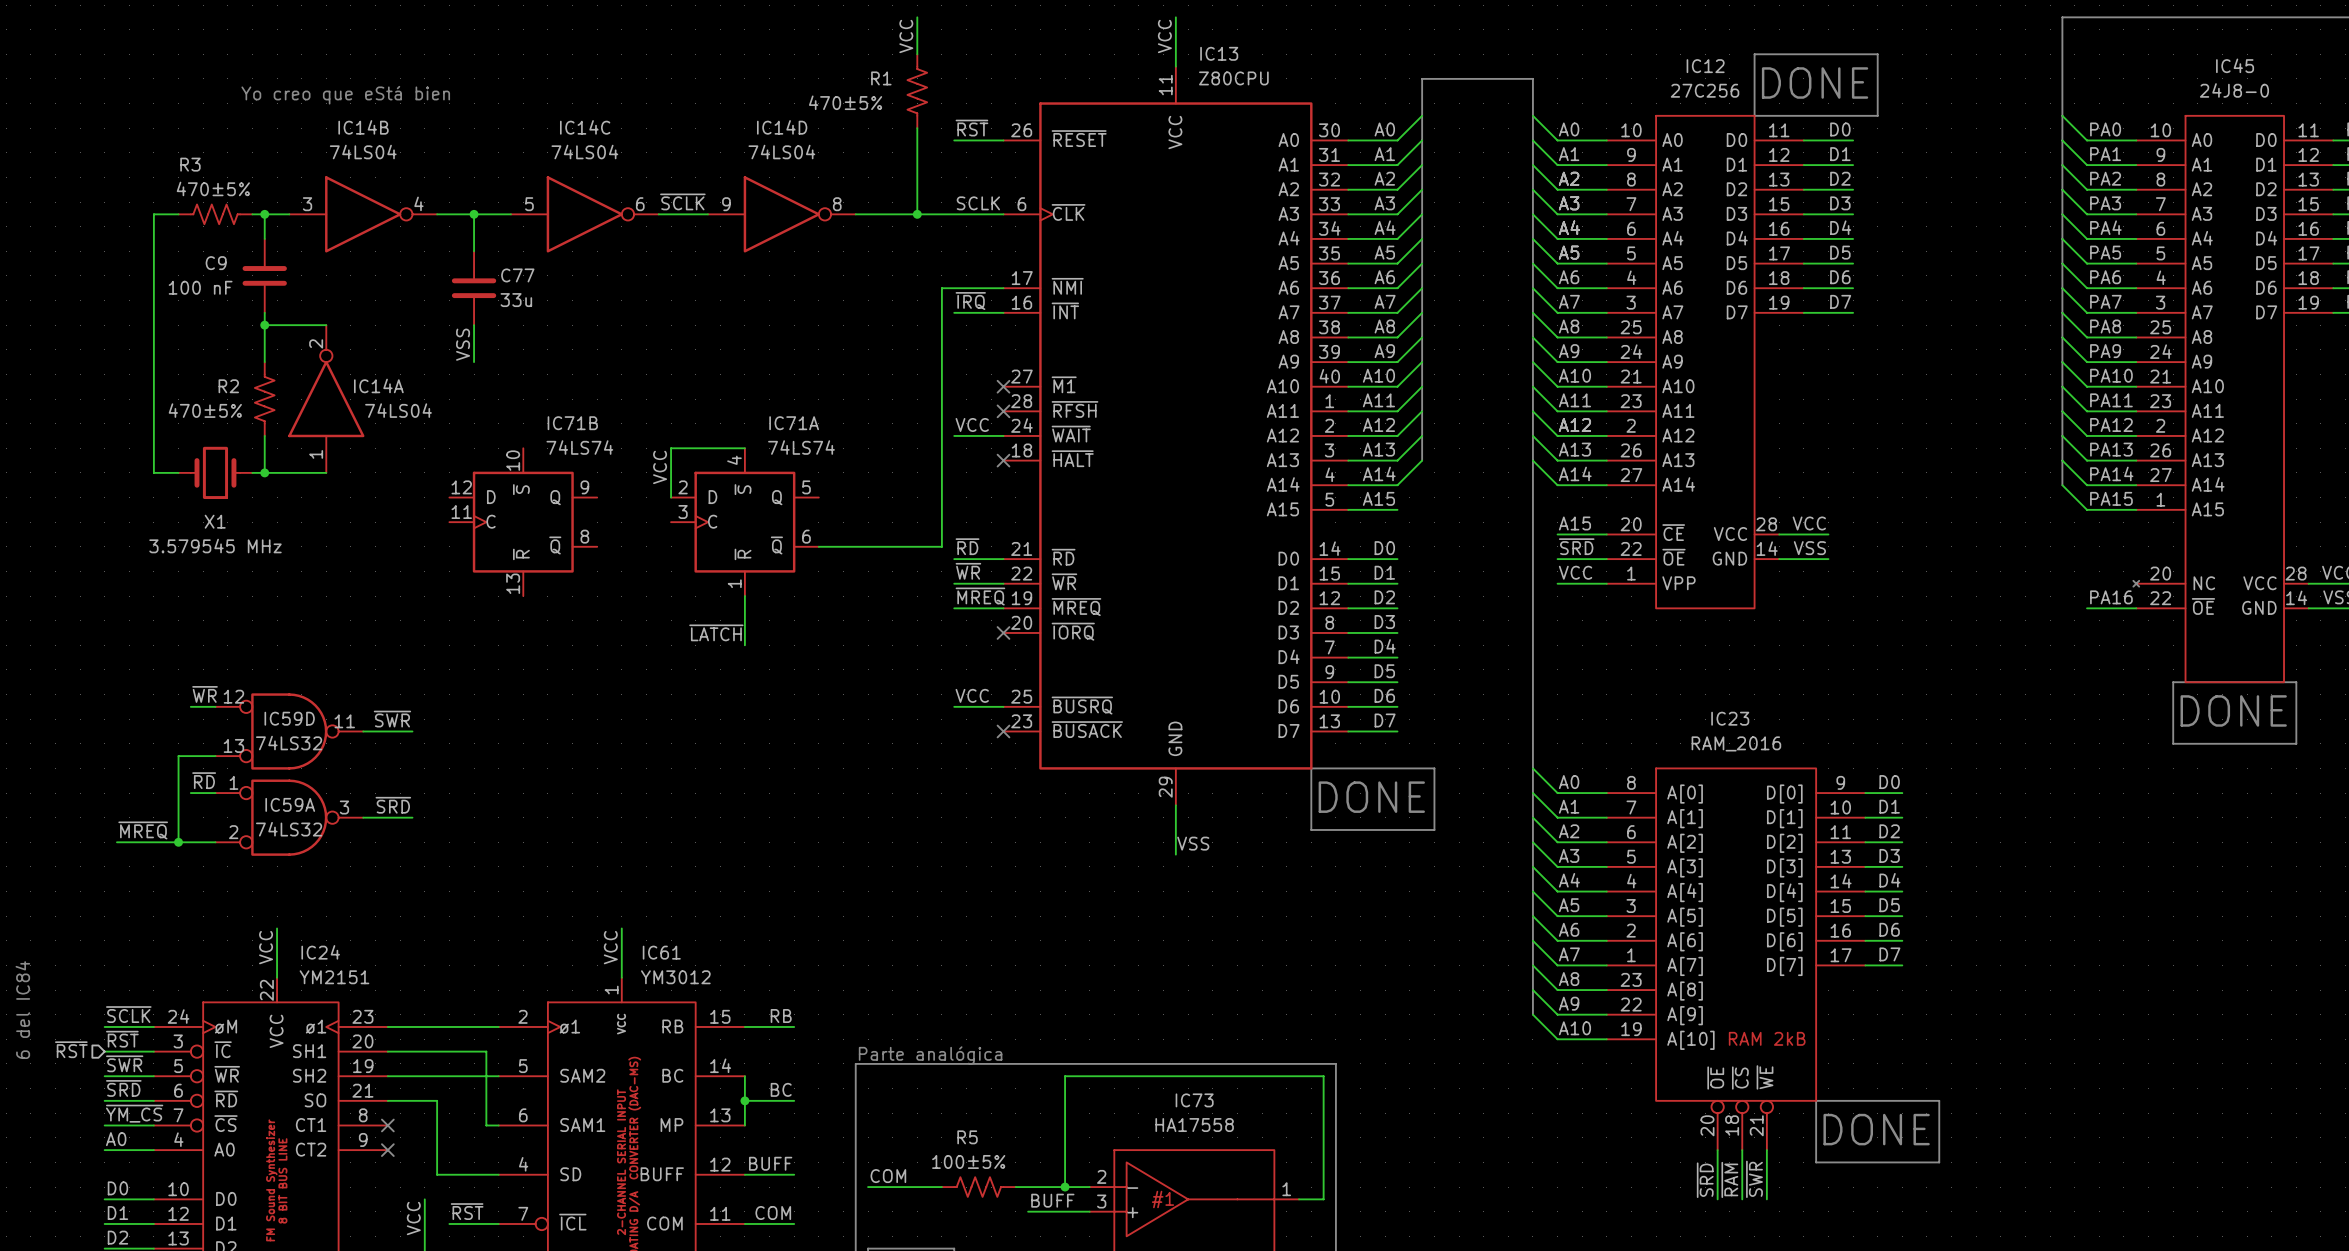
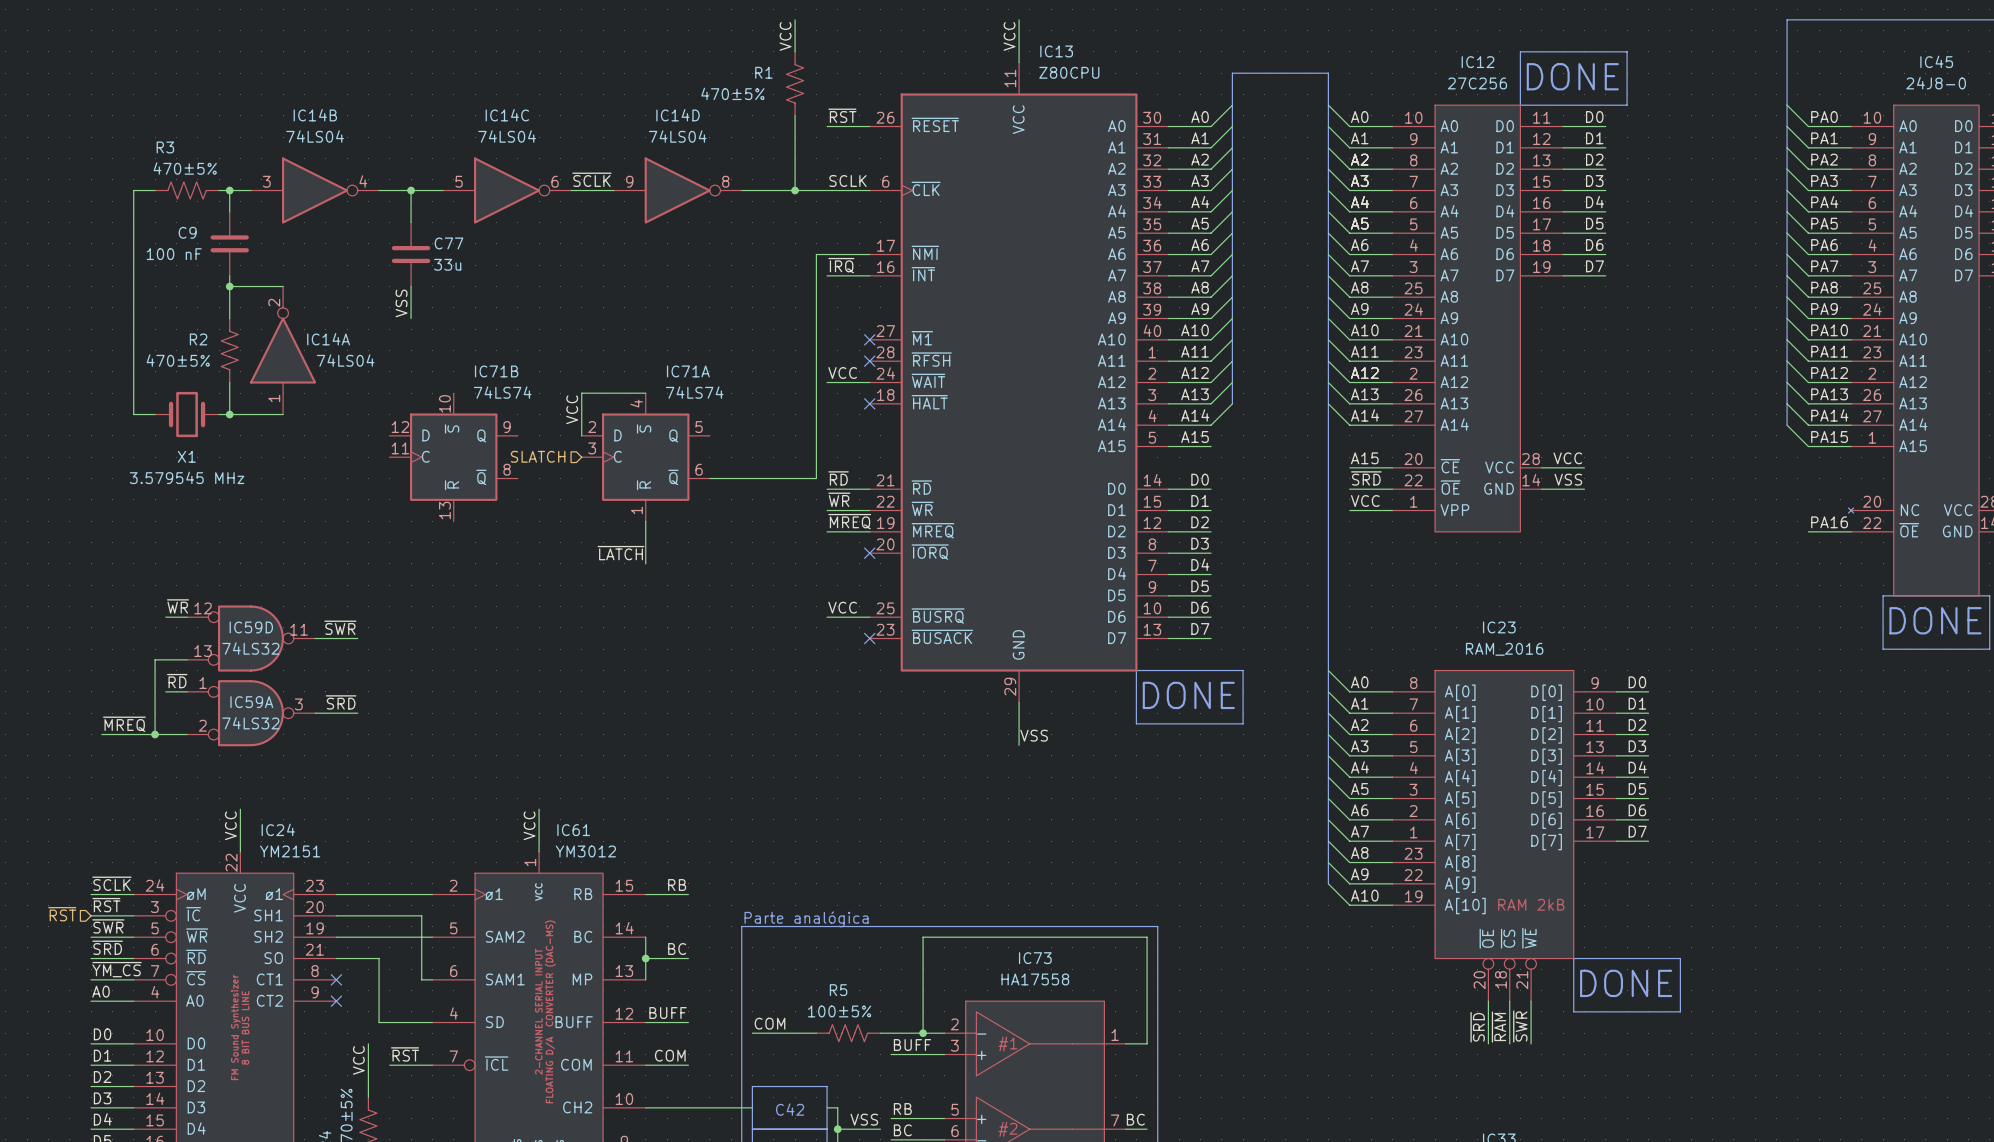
text: Yo creo que eStá bien (345, 95) -> none
hierarchical label: none -> SLATCH (538, 456)
text: 6 del IC84 (22, 1010) -> none

